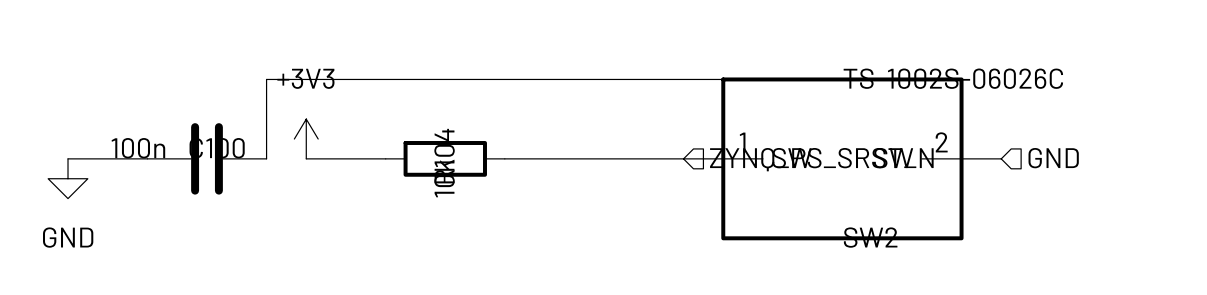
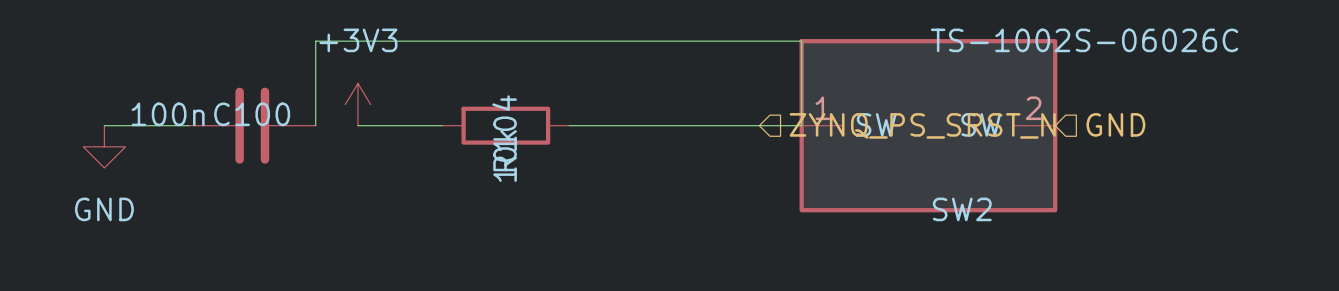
wire: (961, 158) (1001, 158) -> none
hierarchical label position: GND (1053, 158) -> GND (1115, 124)

